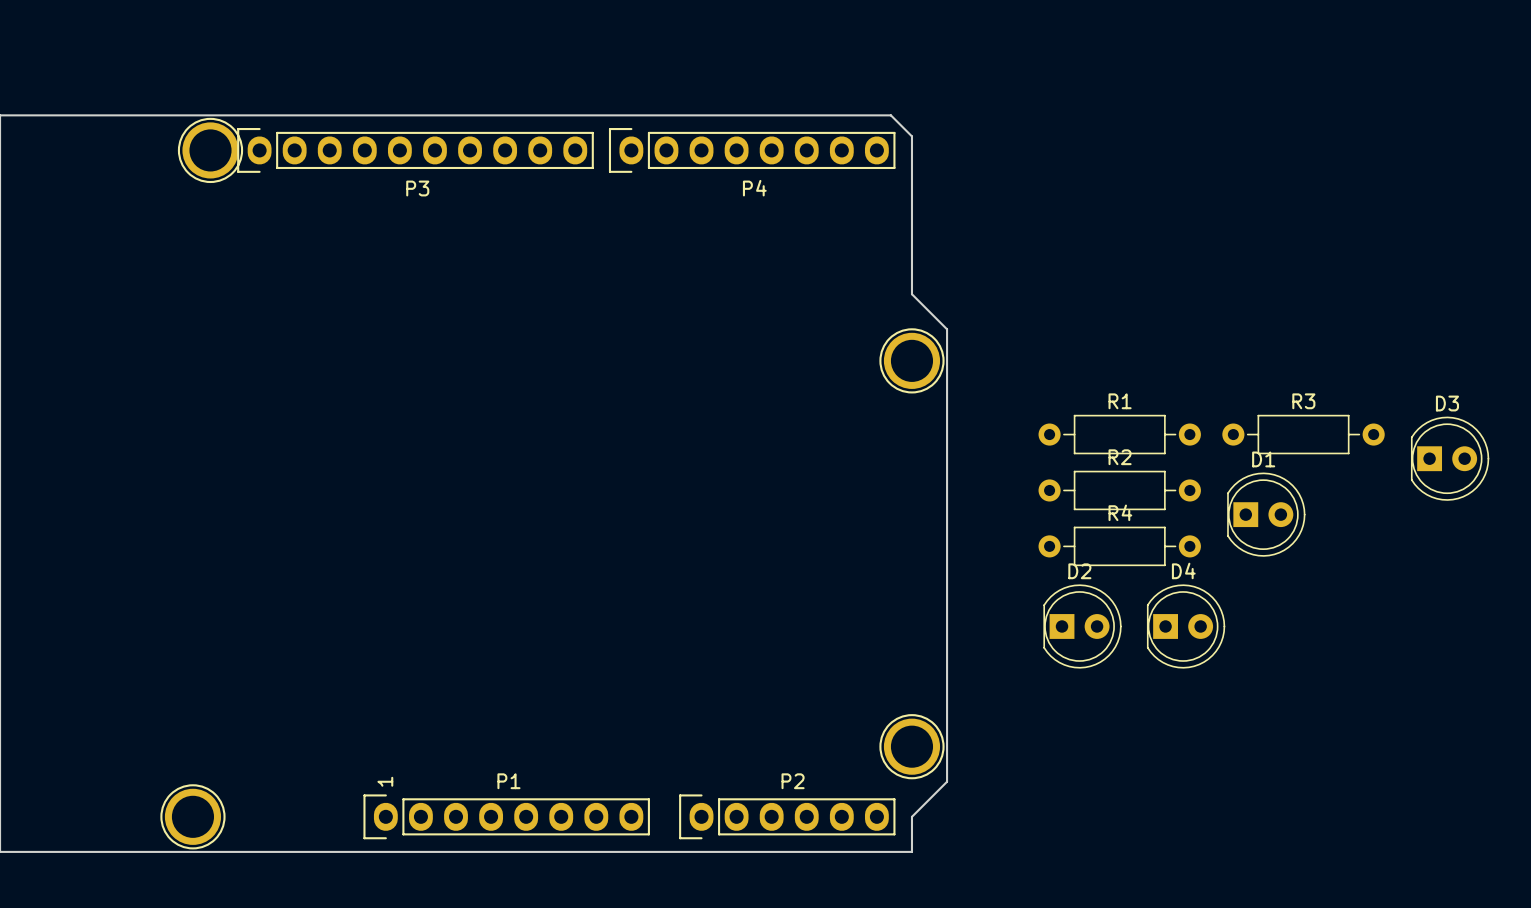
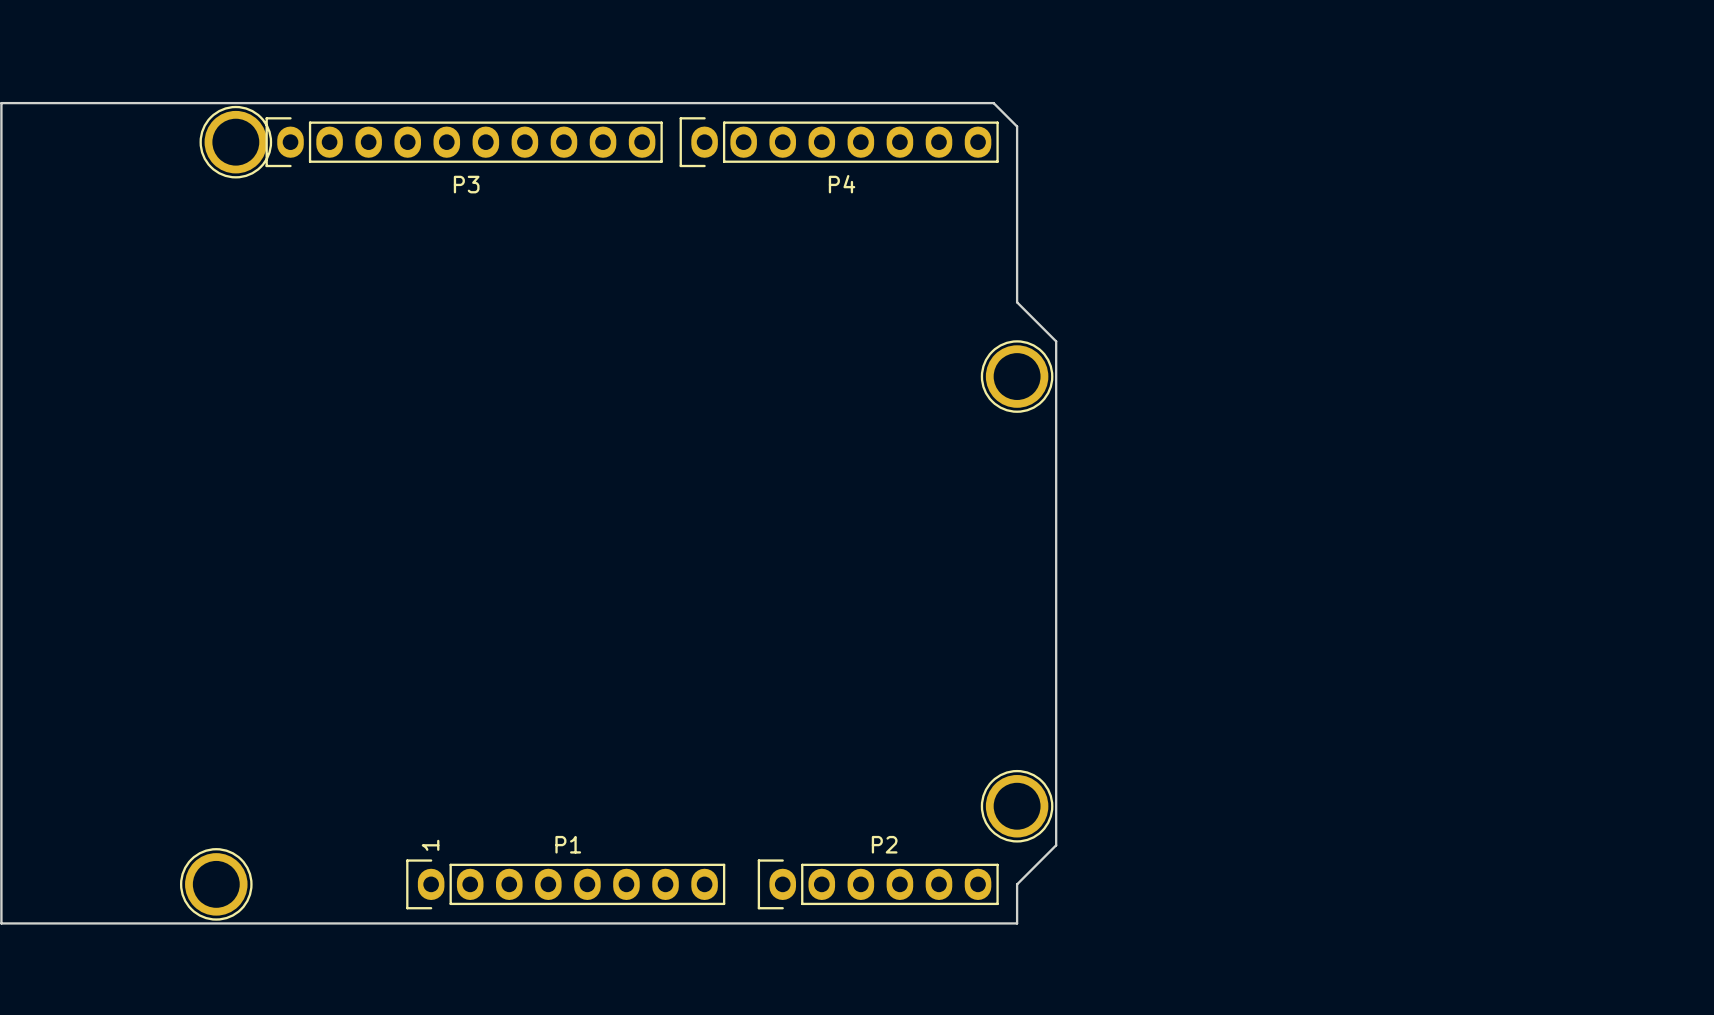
R1: (1119, 434) -> none
R3: (1303, 434) -> none
D3: (1450, 458) -> none
R2: (1119, 490) -> none
D1: (1266, 514) -> none
R4: (1119, 546) -> none
D2: (1082, 626) -> none
D4: (1186, 626) -> none

